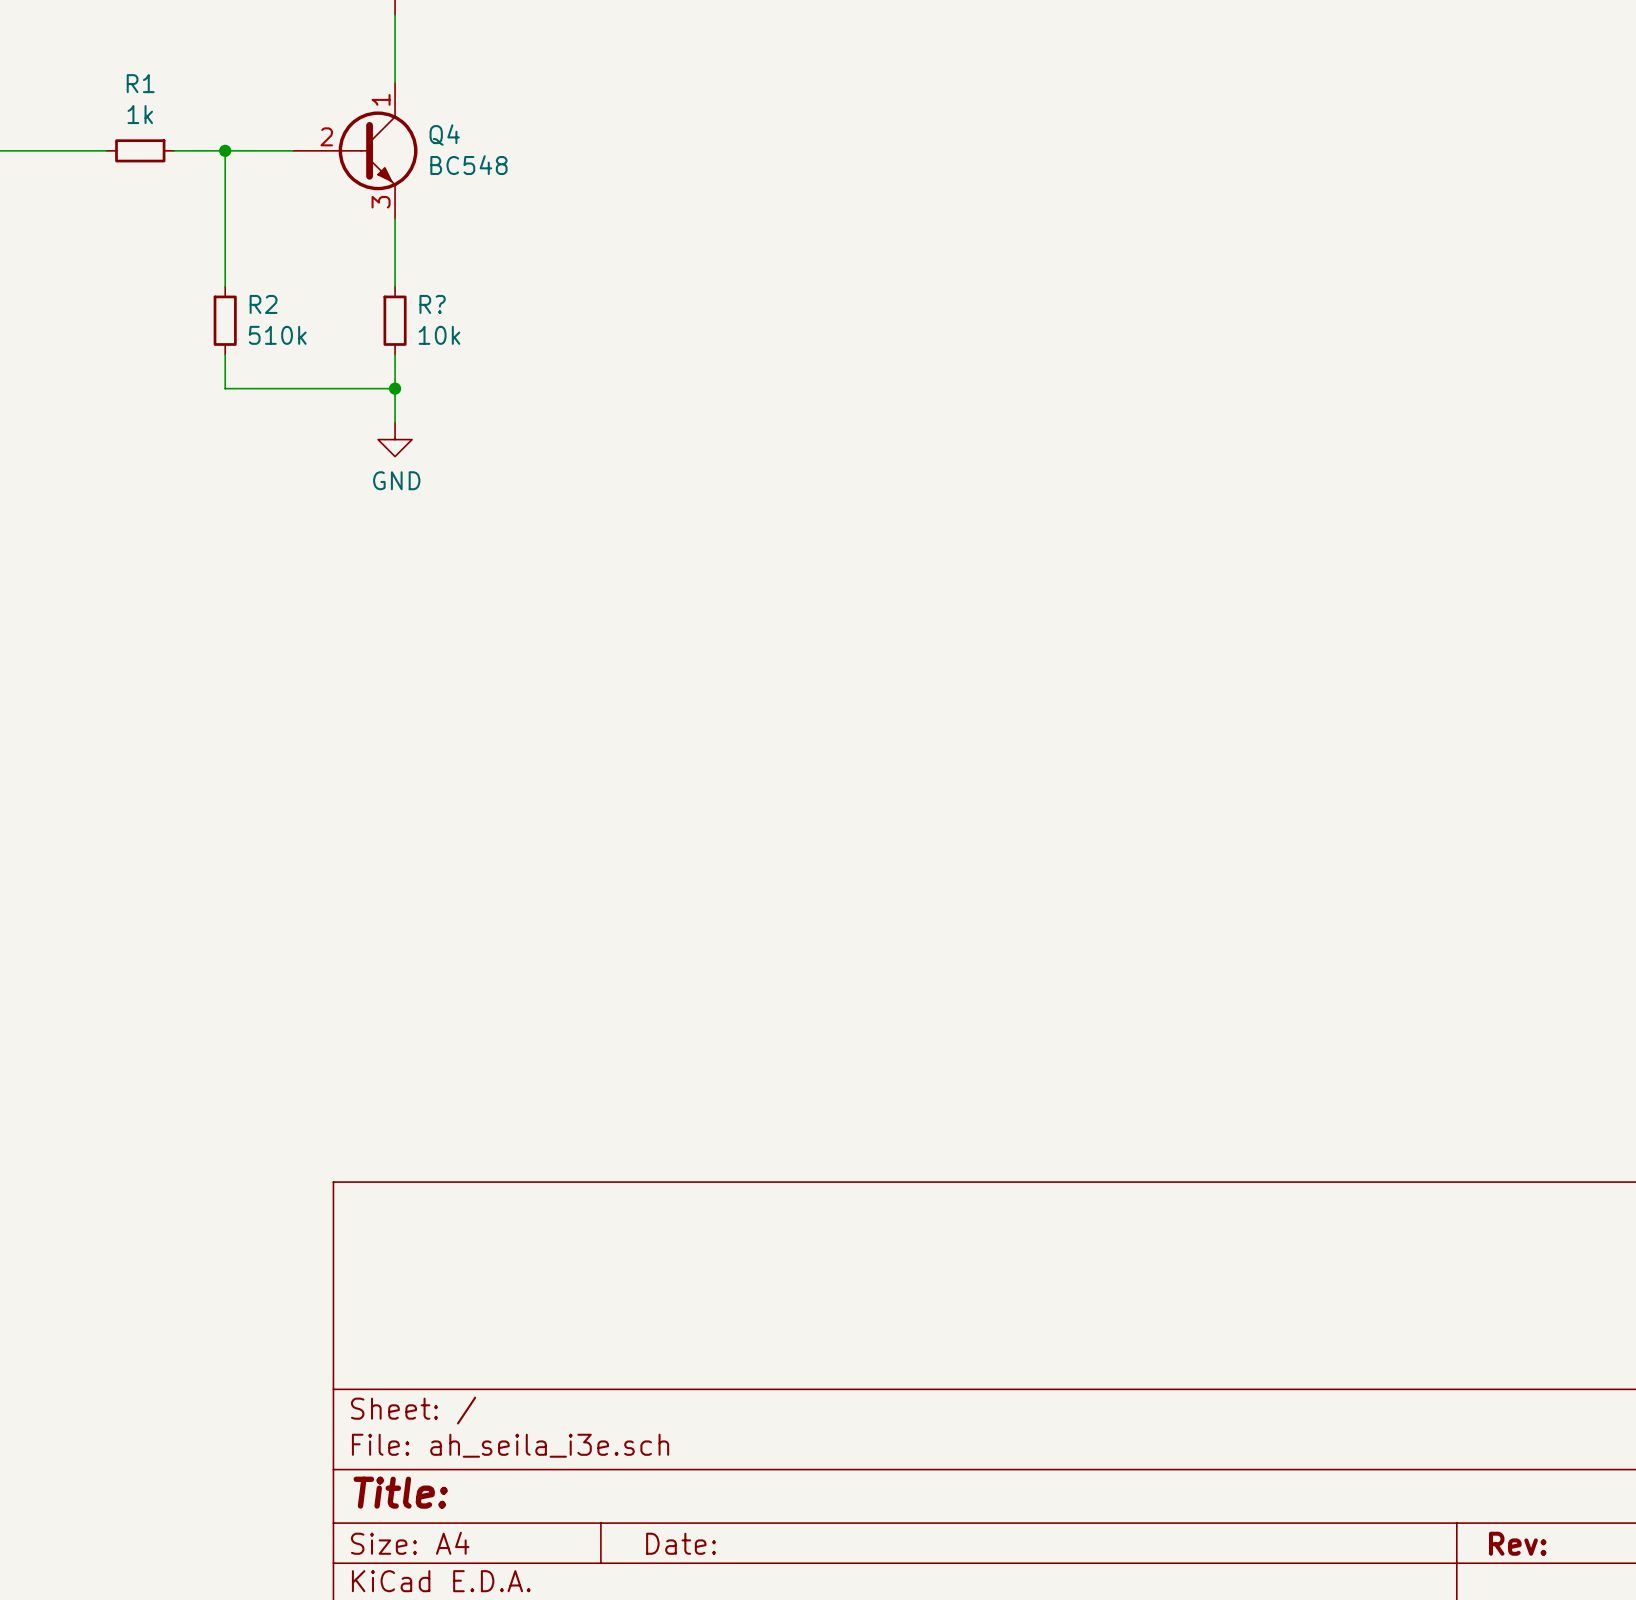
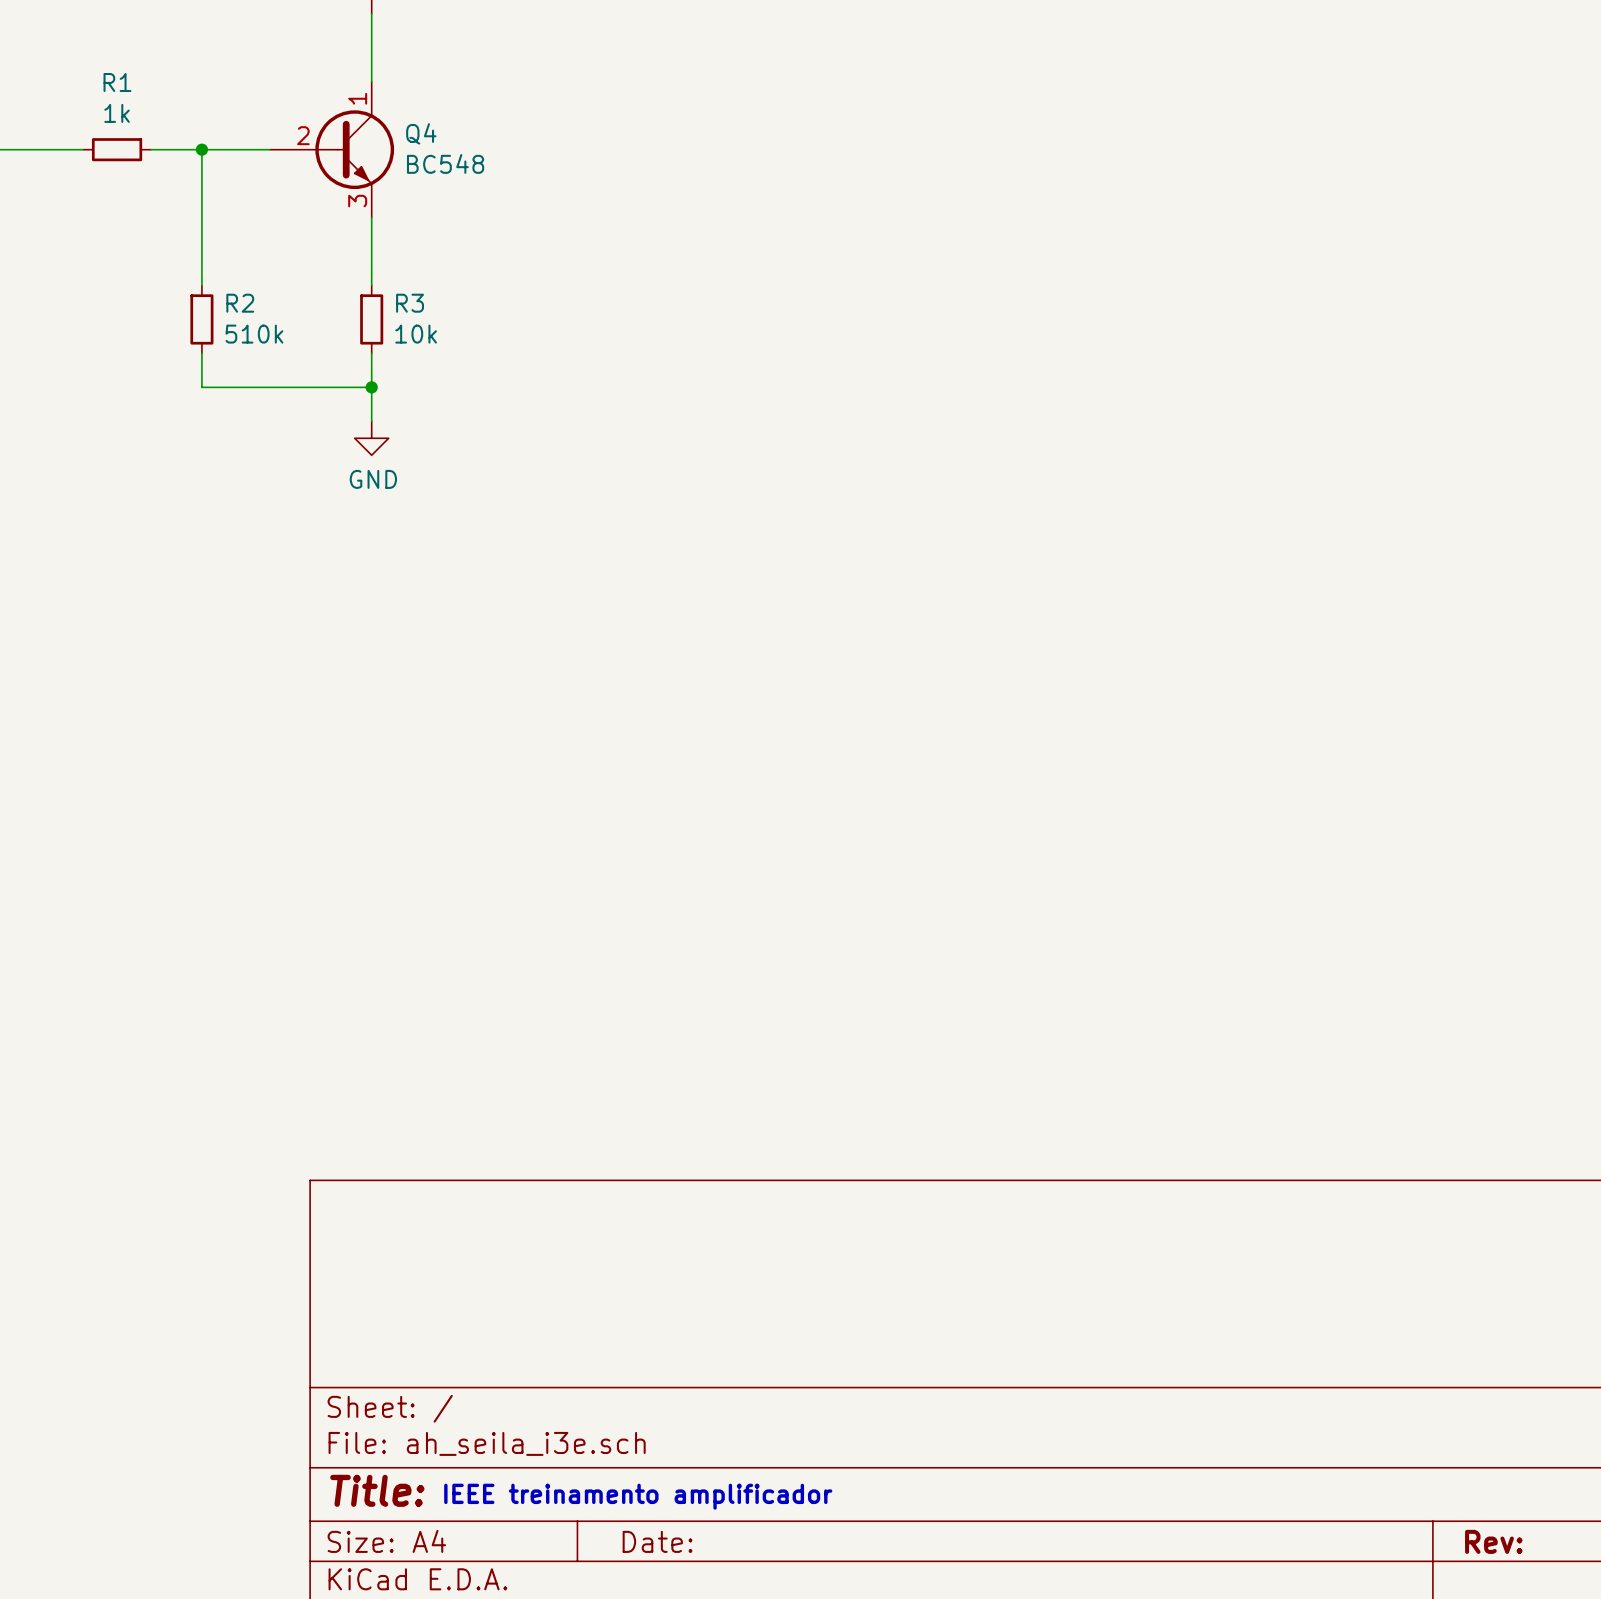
R? name: R? (432, 304) -> R3 (410, 303)
text: none -> IEEE treinamento amplificador (638, 1496)

